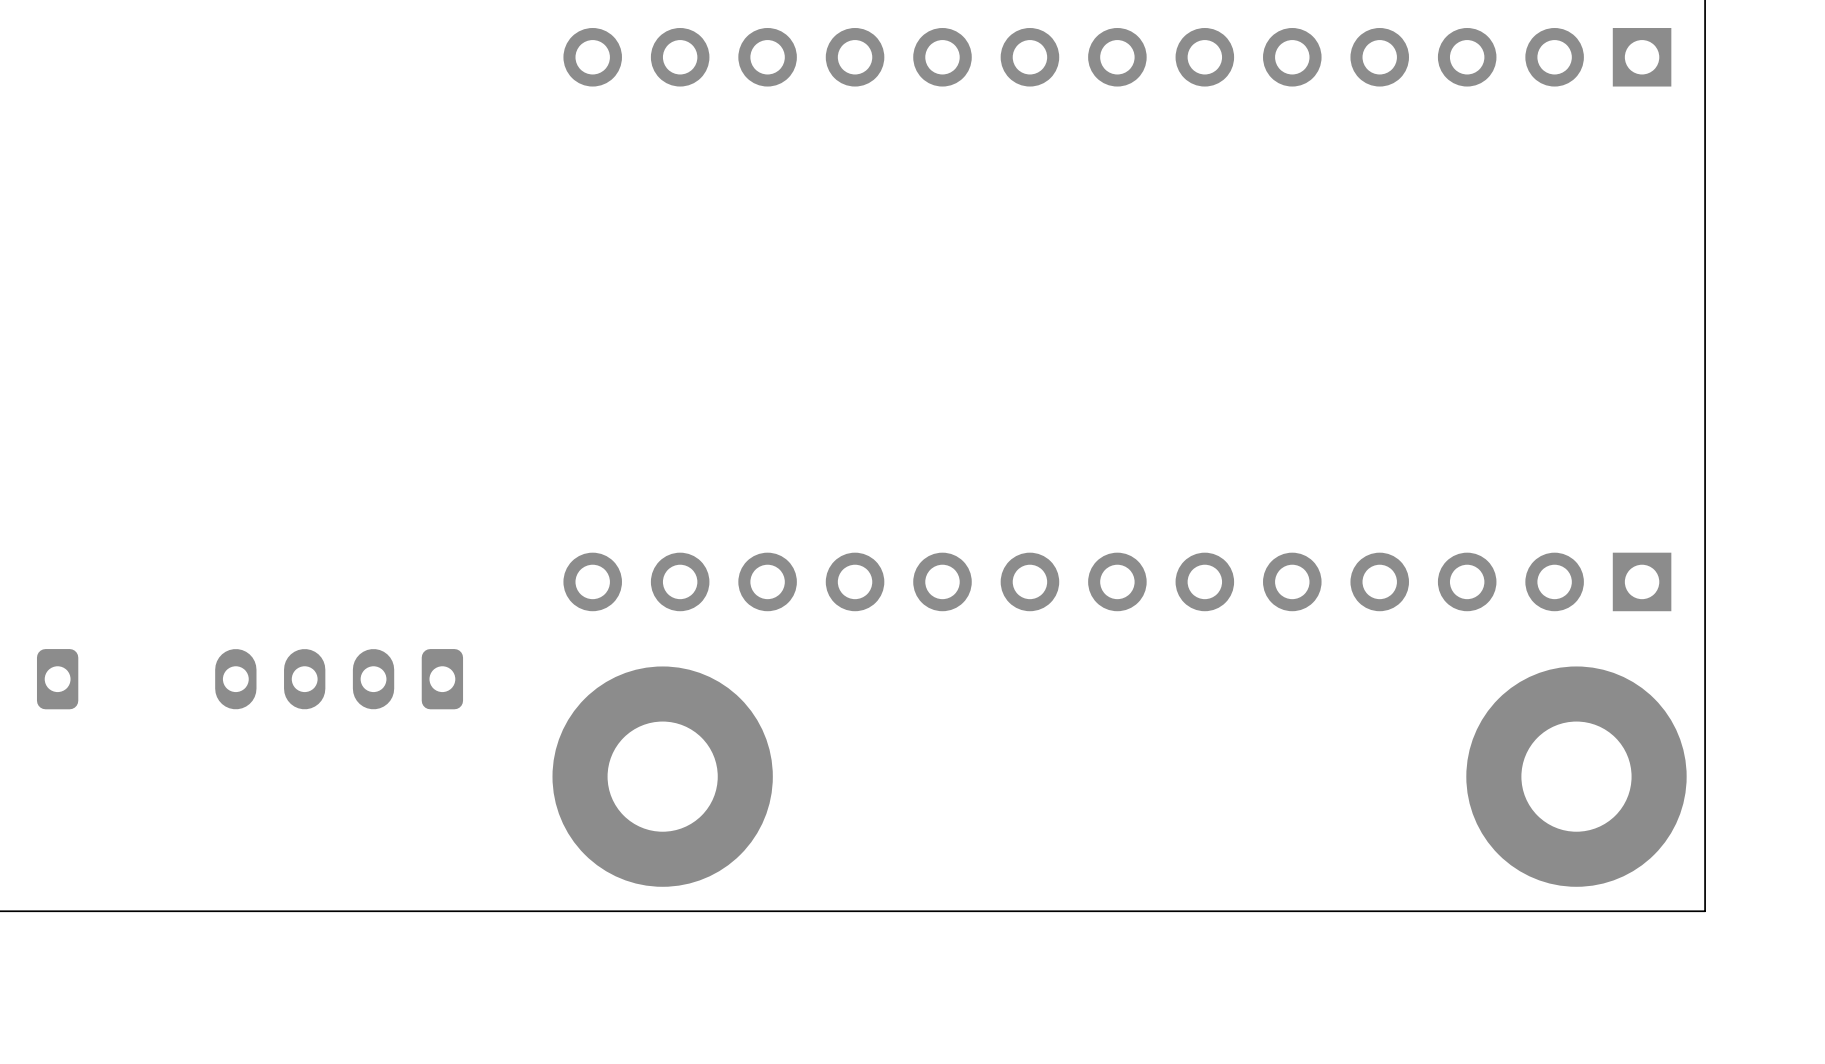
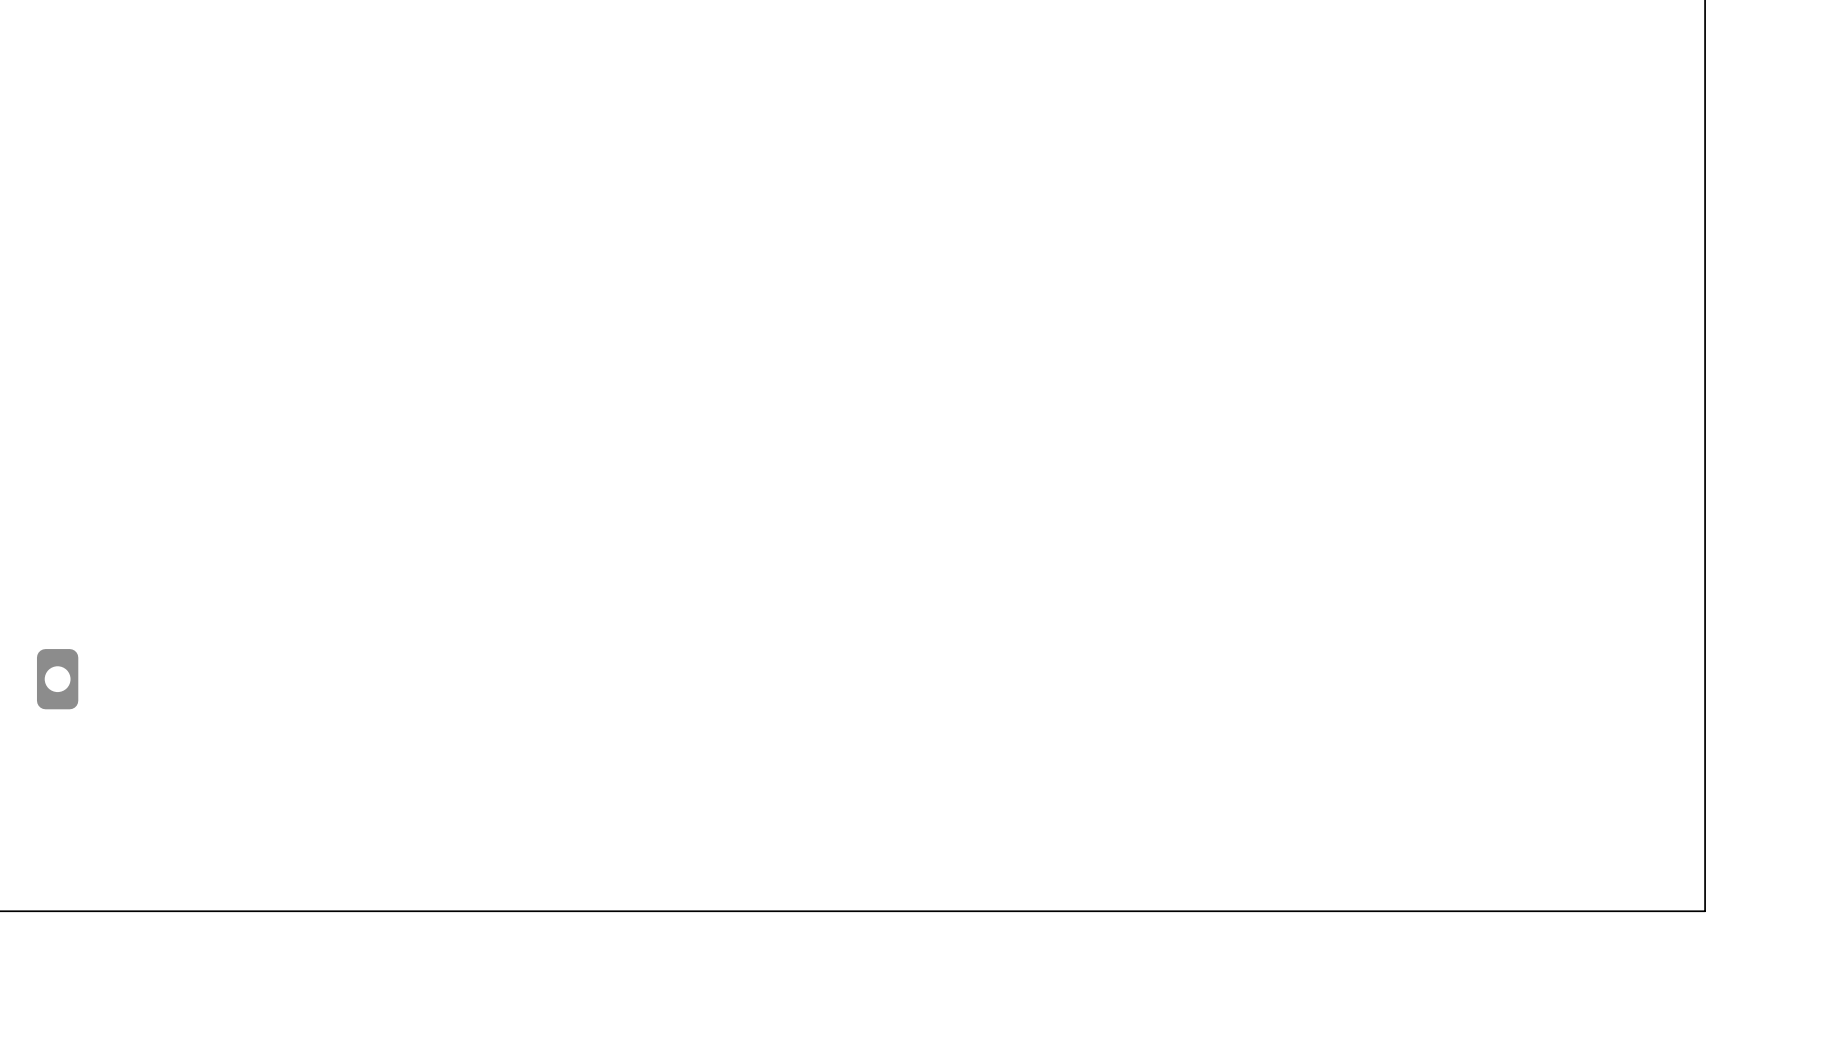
part: (1117, 57) -> none
part: (1117, 581) -> none
part: (339, 679) -> none
part: (662, 776) -> none
part: (1576, 776) -> none

